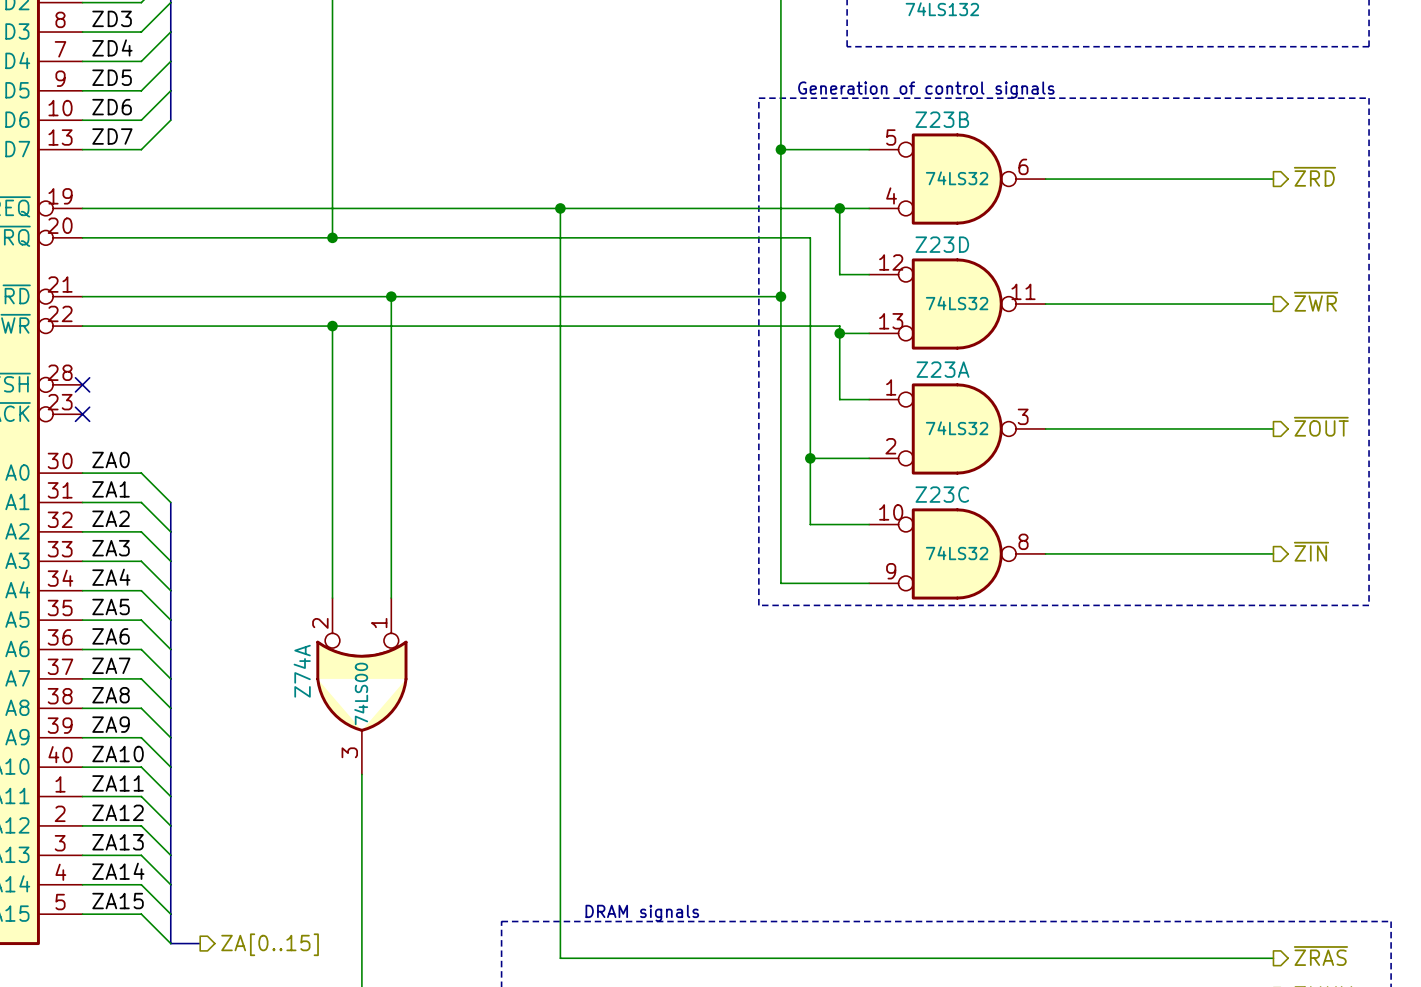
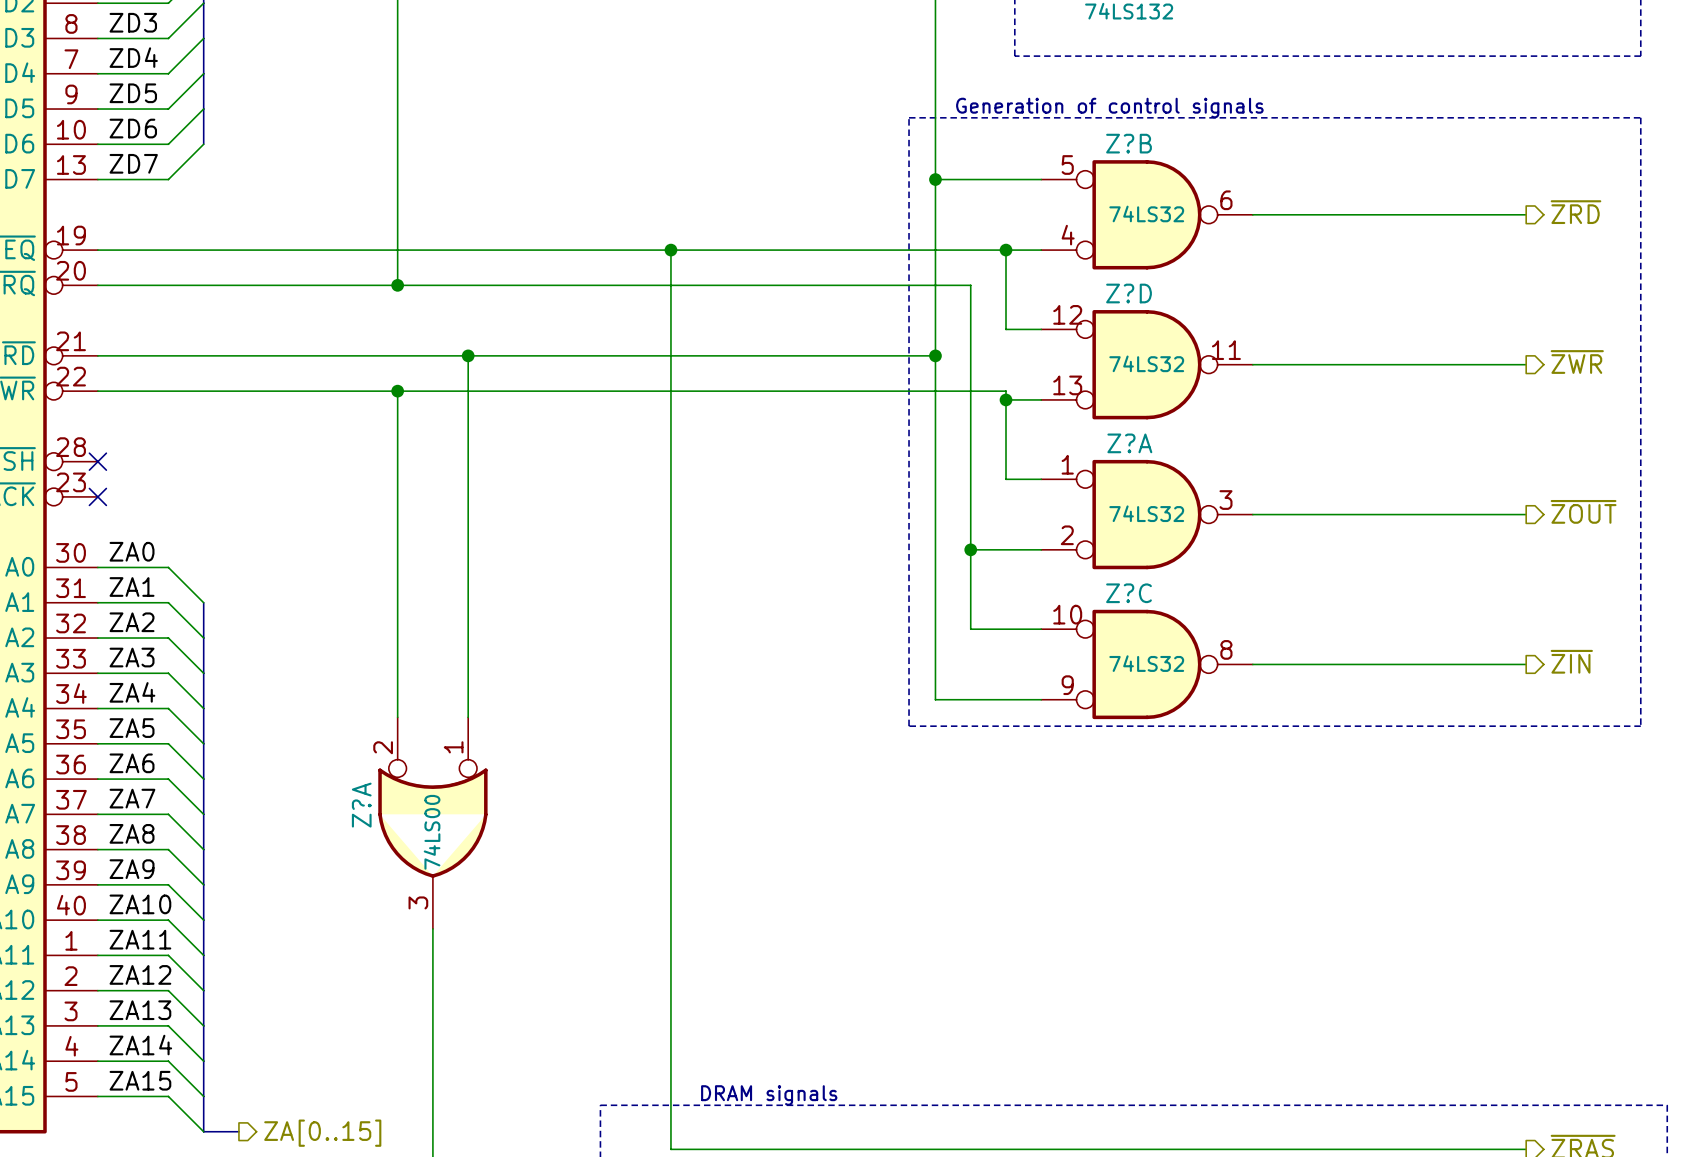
Z23B name: Z23B (942, 119) -> Z?B (1129, 143)
Z23D name: Z23D (942, 244) -> Z?D (1129, 293)
Z23A name: Z23A (943, 369) -> Z?A (1129, 443)
Z23C name: Z23C (942, 494) -> Z?C (1129, 593)
Z74A name: Z74A (302, 671) -> Z?A (361, 805)

